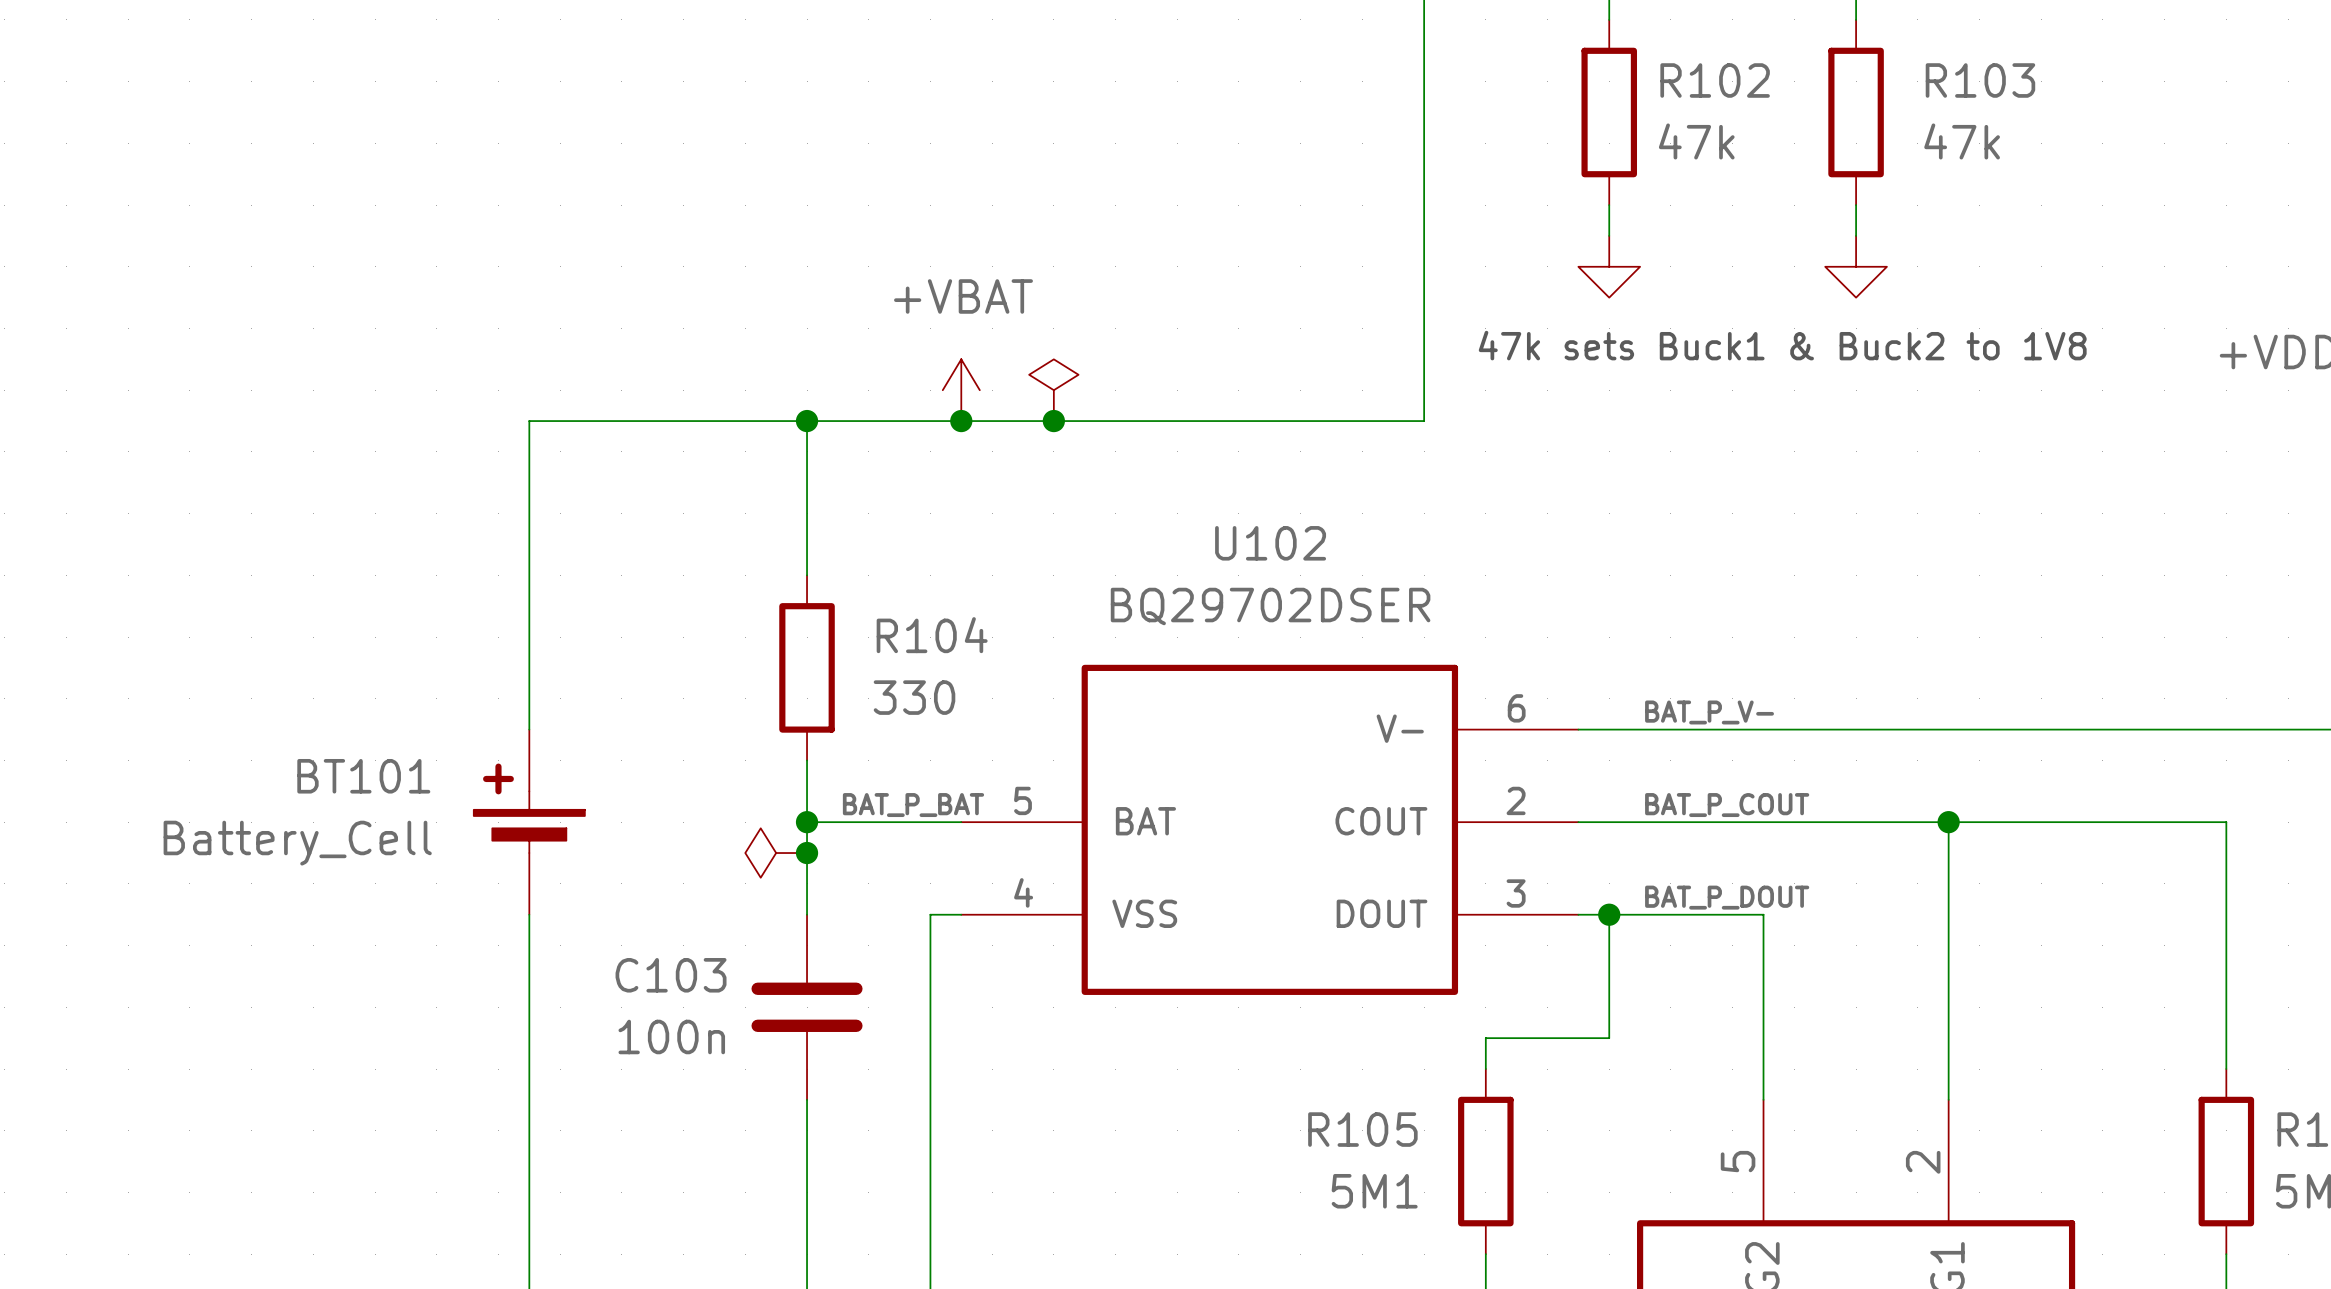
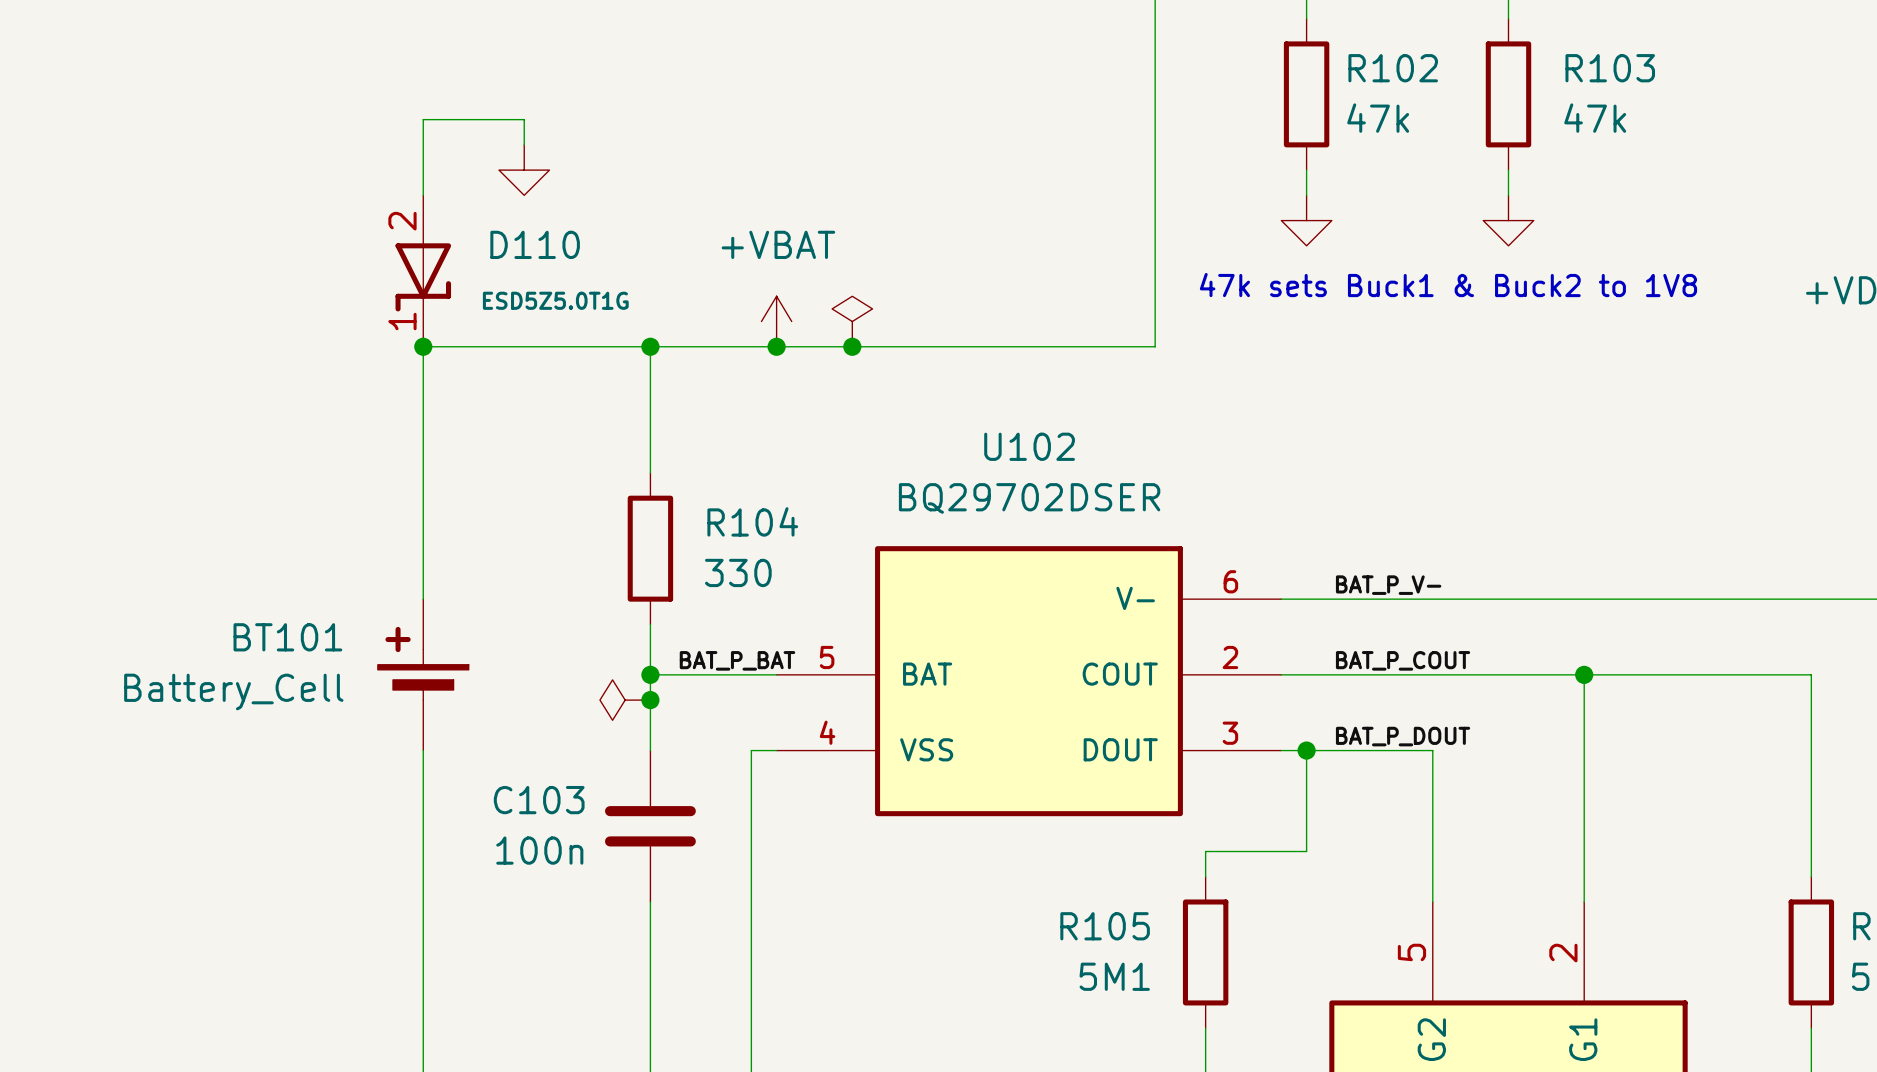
wire: none -> (524, 144) (524, 119) (423, 119) (423, 195)
power symbol: none -> (524, 170)
D110: none -> ESD5Z5.0T1G (423, 271)
junction: none -> (423, 346)

